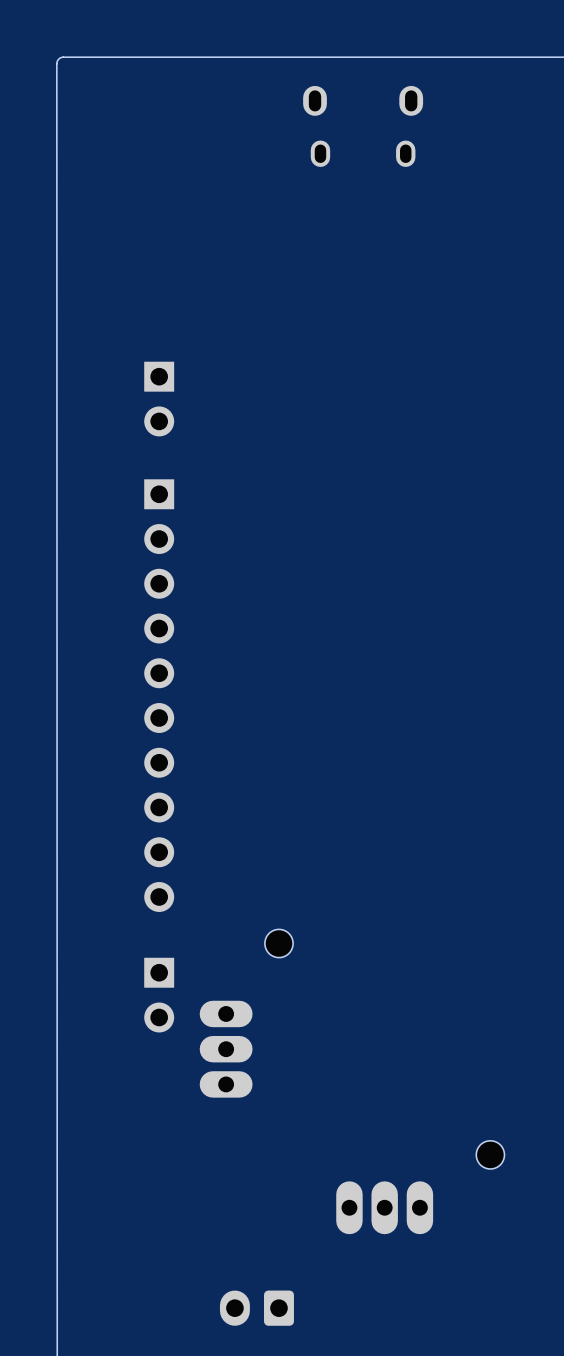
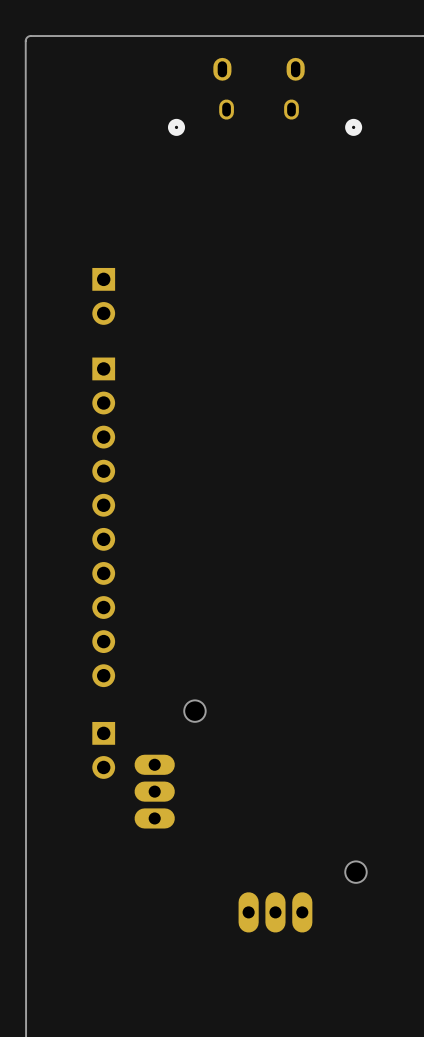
part: none -> (176, 127)
part: none -> (353, 127)
part: (256, 1308) -> none

